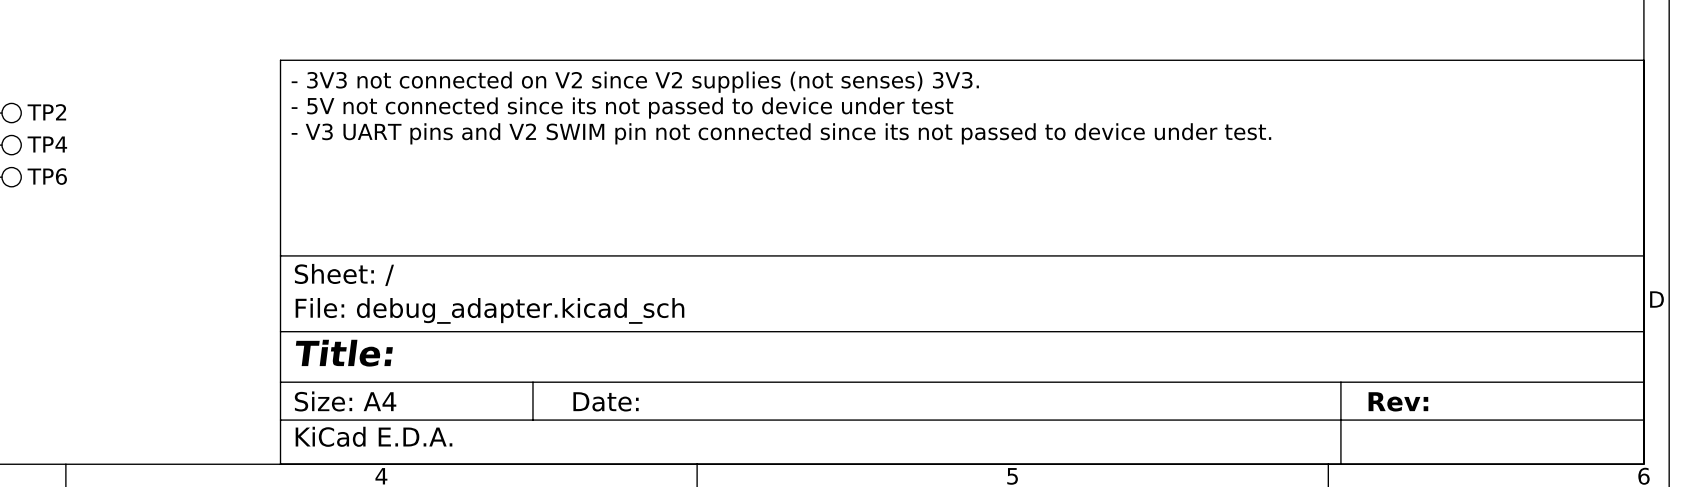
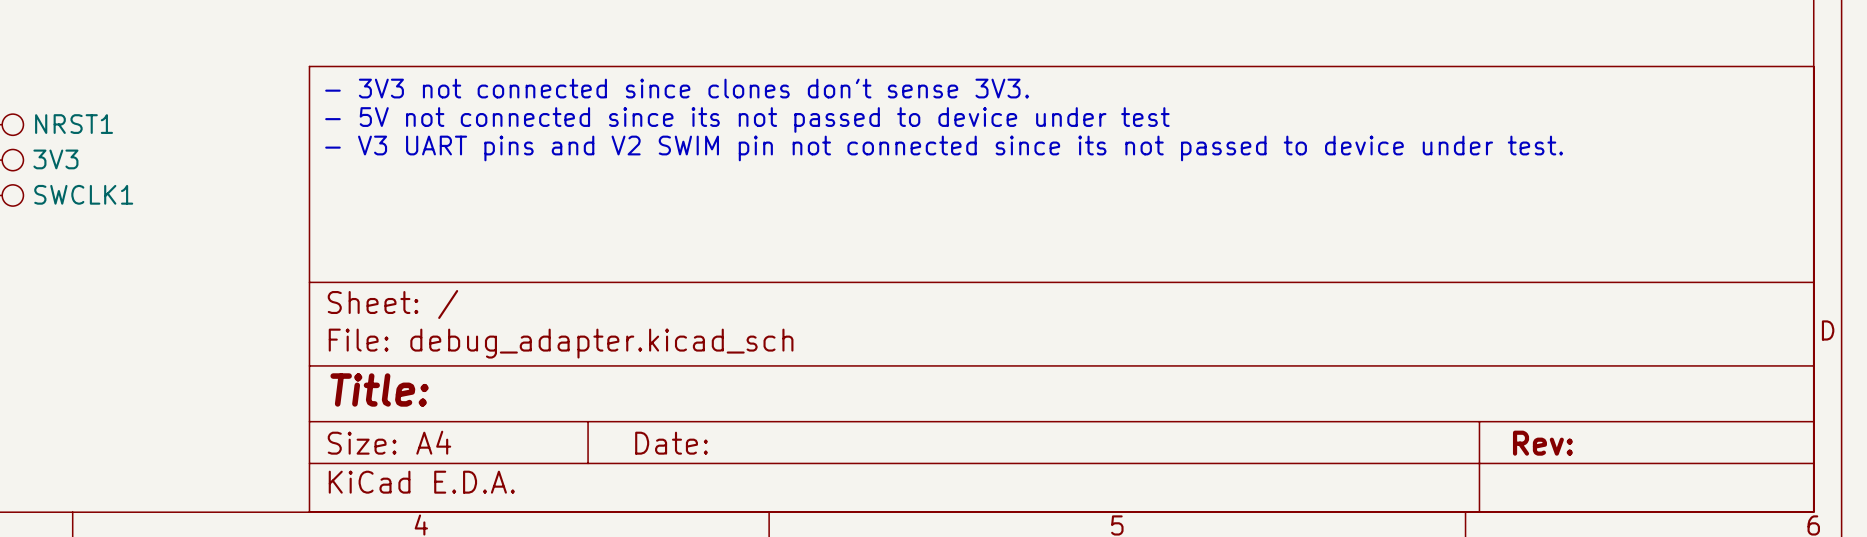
text: - 3V3 not connected on V2 since V2 supplies (not senses) 3V3. (635, 82) -> - 3V3 not connected since clones don't sense 3V3. (677, 88)
TP2 name: TP2 (46, 112) -> NRST1 (74, 124)
TP4 name: TP4 (47, 144) -> 3V3 (55, 159)
TP6 name: TP6 (47, 176) -> SWCLK1 (83, 194)

